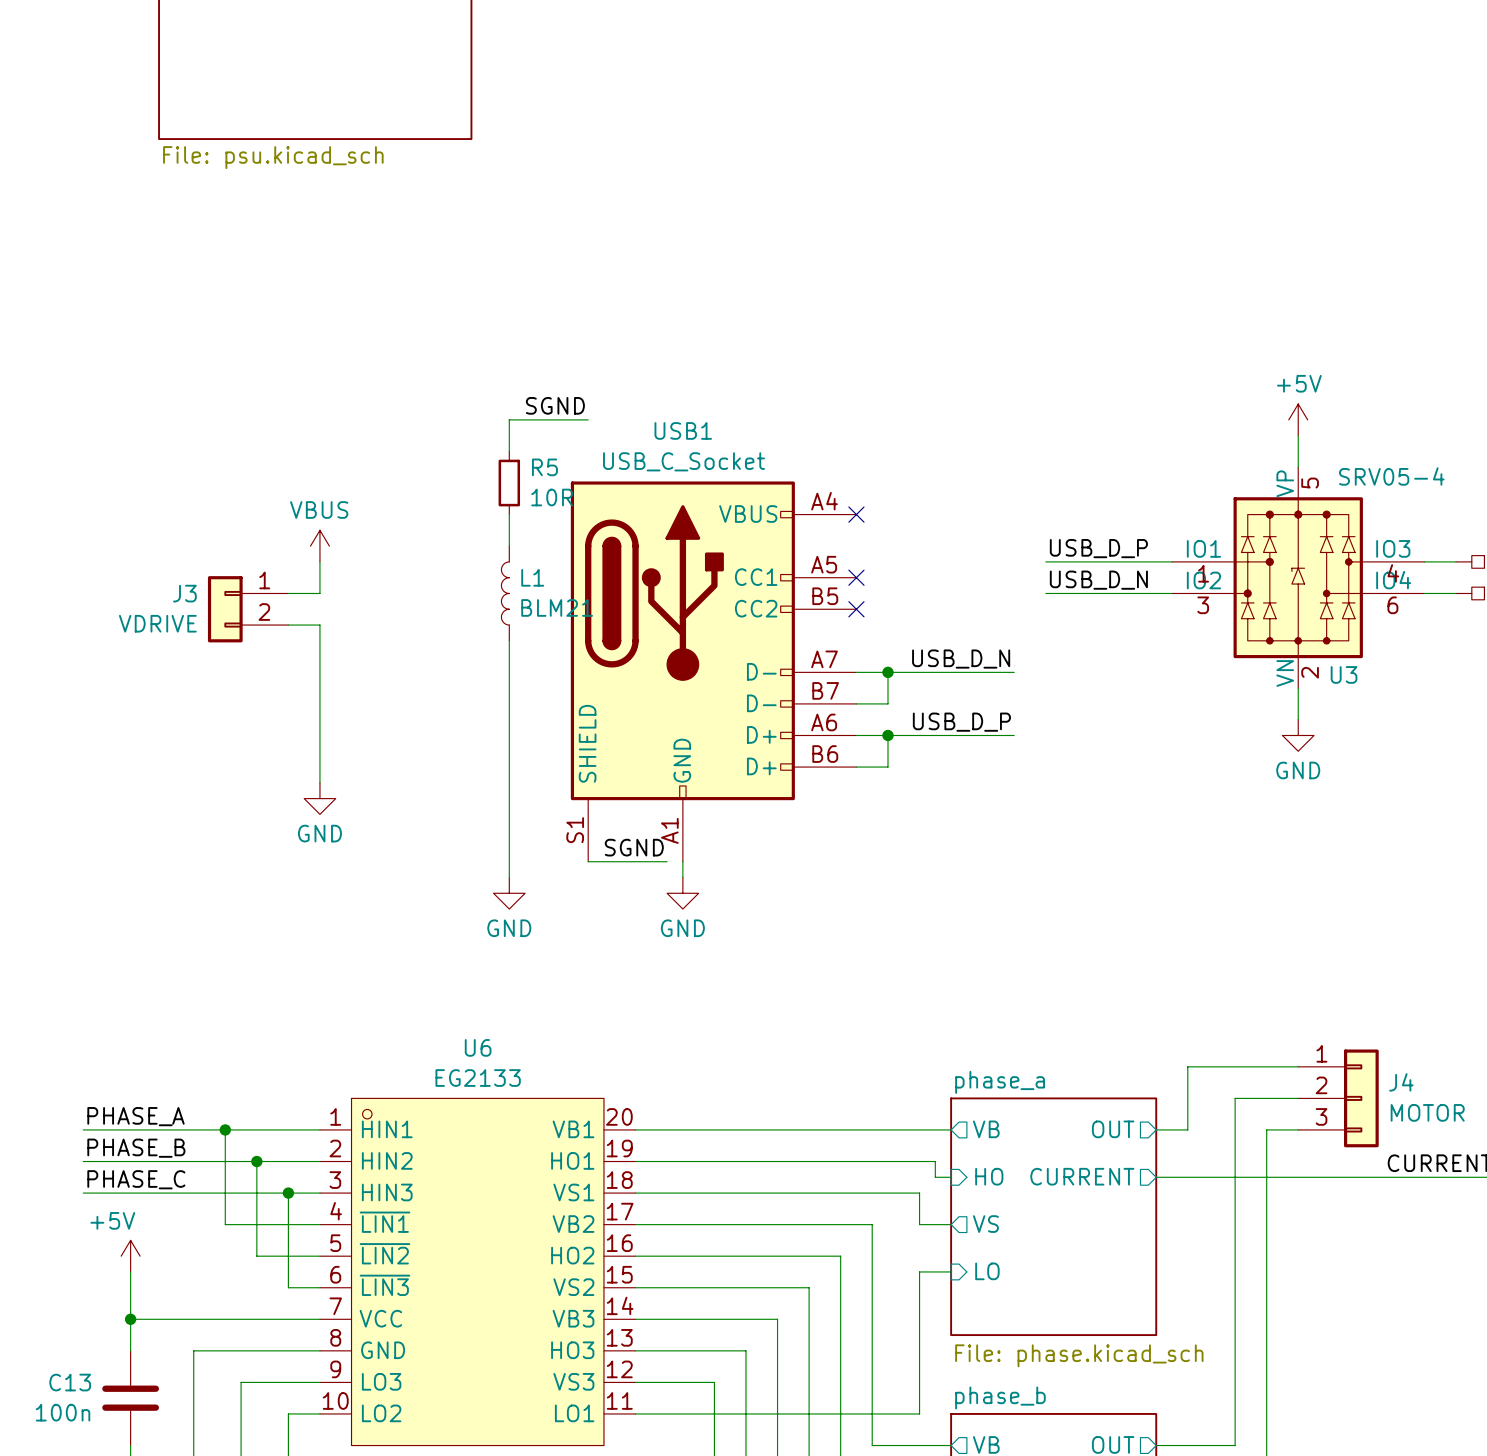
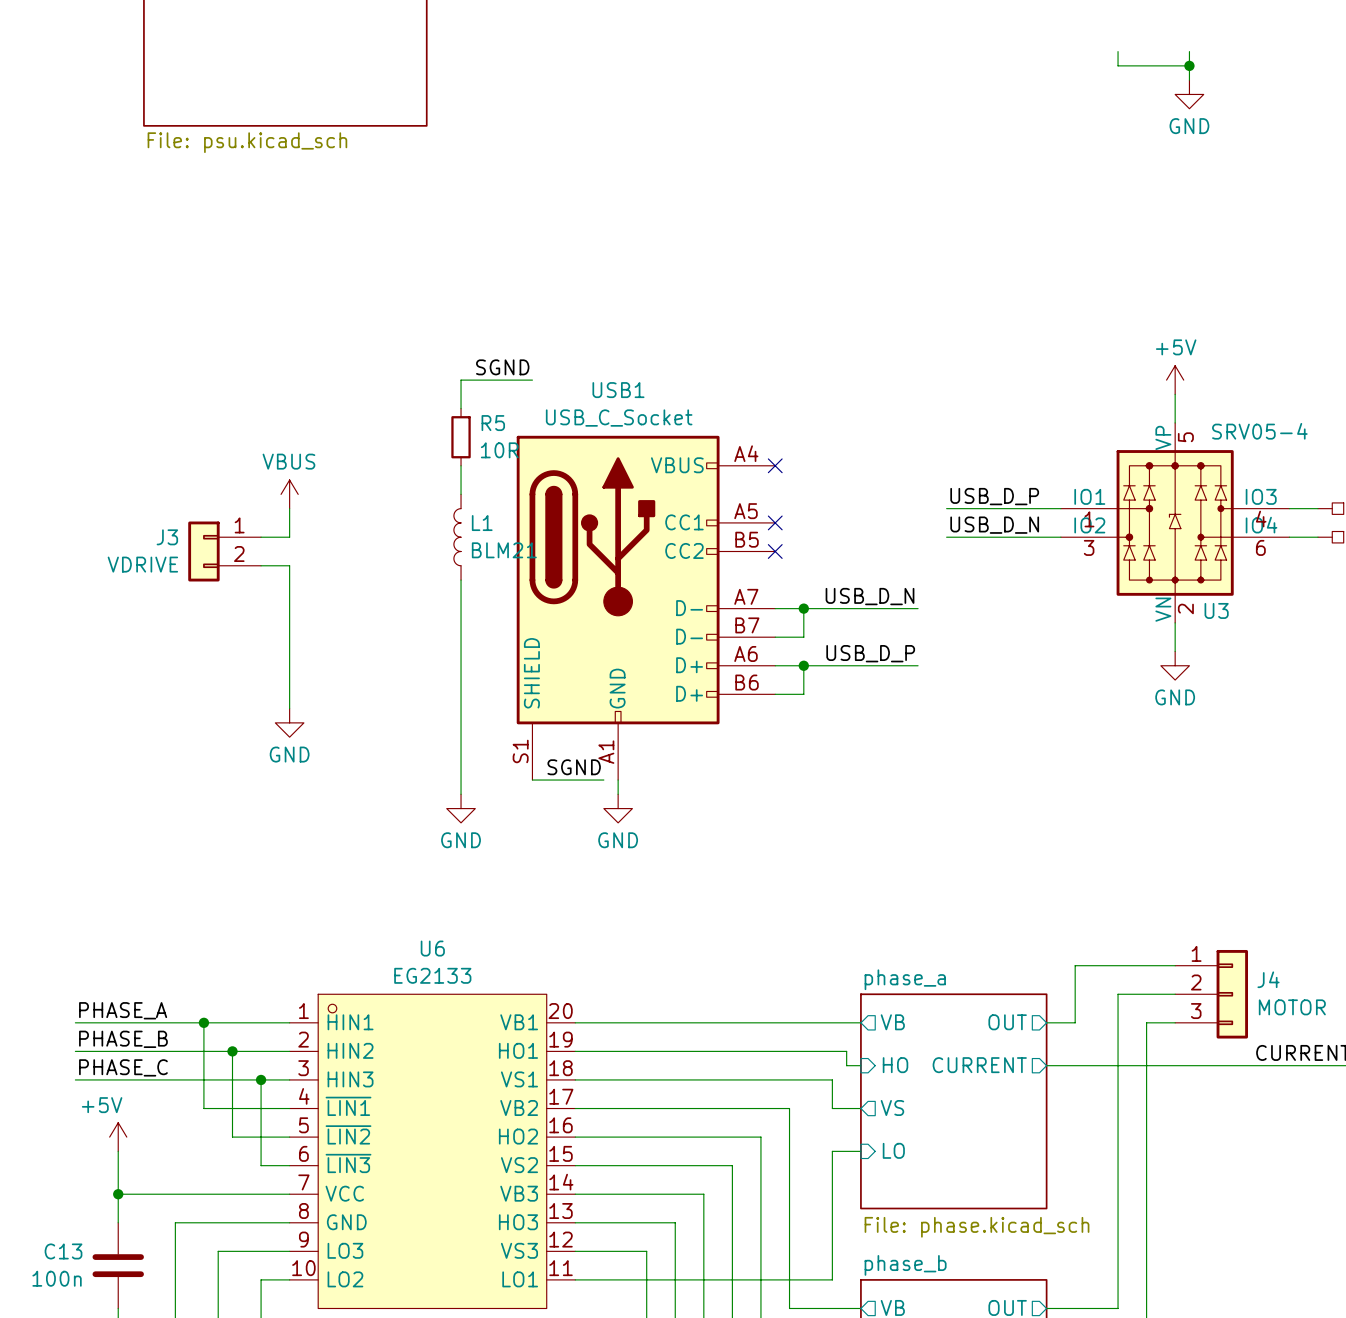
wire: none -> (1118, 51) (1118, 65) (1189, 65)
wire: none -> (1189, 51) (1189, 80)
junction: none -> (1189, 65)
power symbol: none -> GND (1189, 94)

